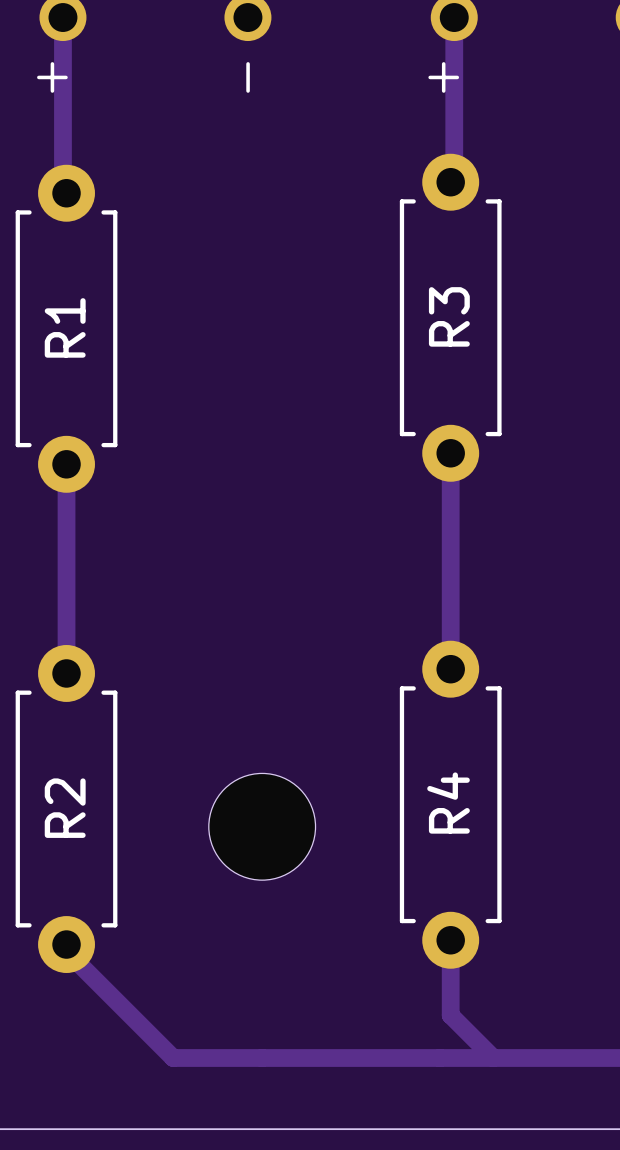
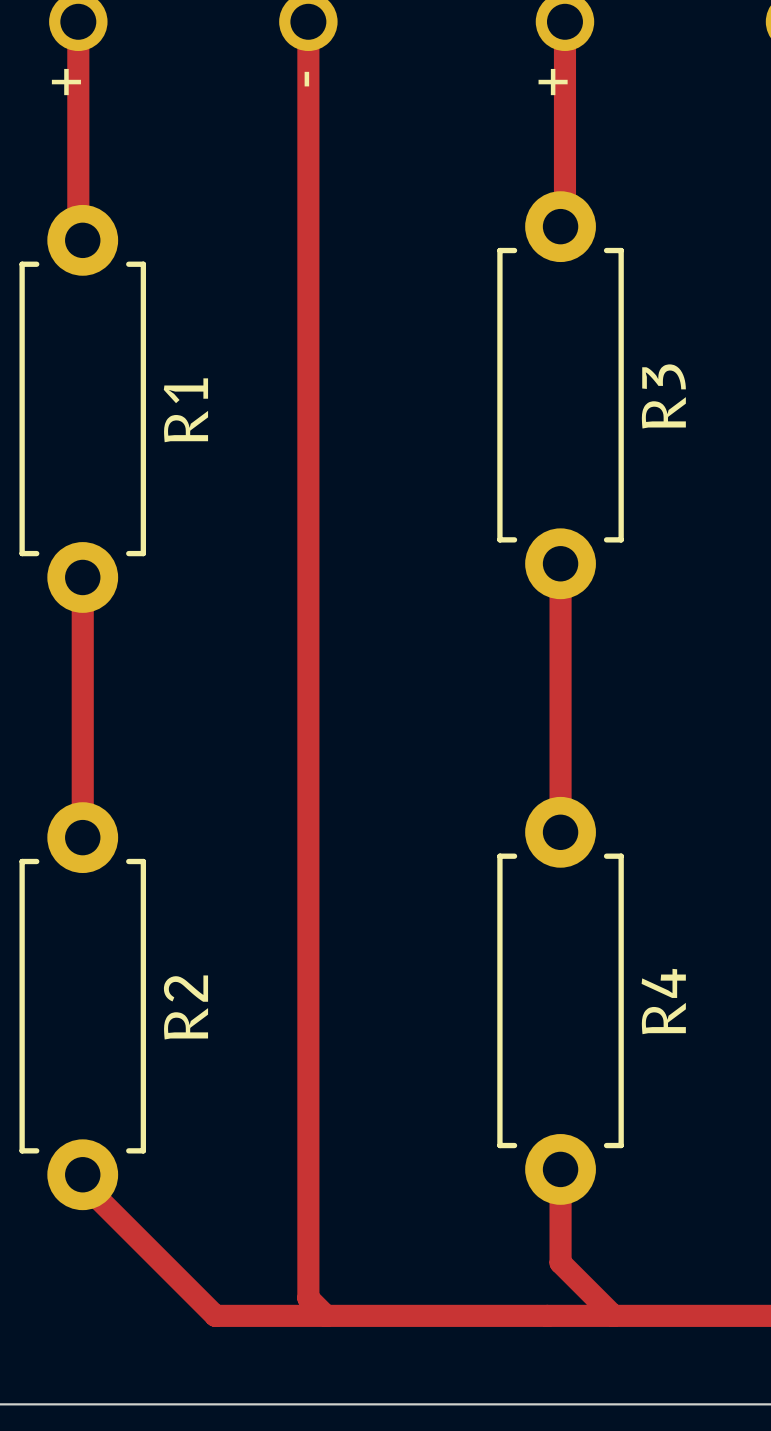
track: none -> (308, 21) (308, 1298) (326, 1315)
R3 name position: R3 (449, 316) -> R3 (663, 396)
R1 name position: R1 (65, 327) -> R1 (185, 410)
R4 name position: R4 (448, 803) -> R4 (663, 1001)
R2 name position: R2 (65, 808) -> R2 (185, 1007)
part: (262, 826) -> none

